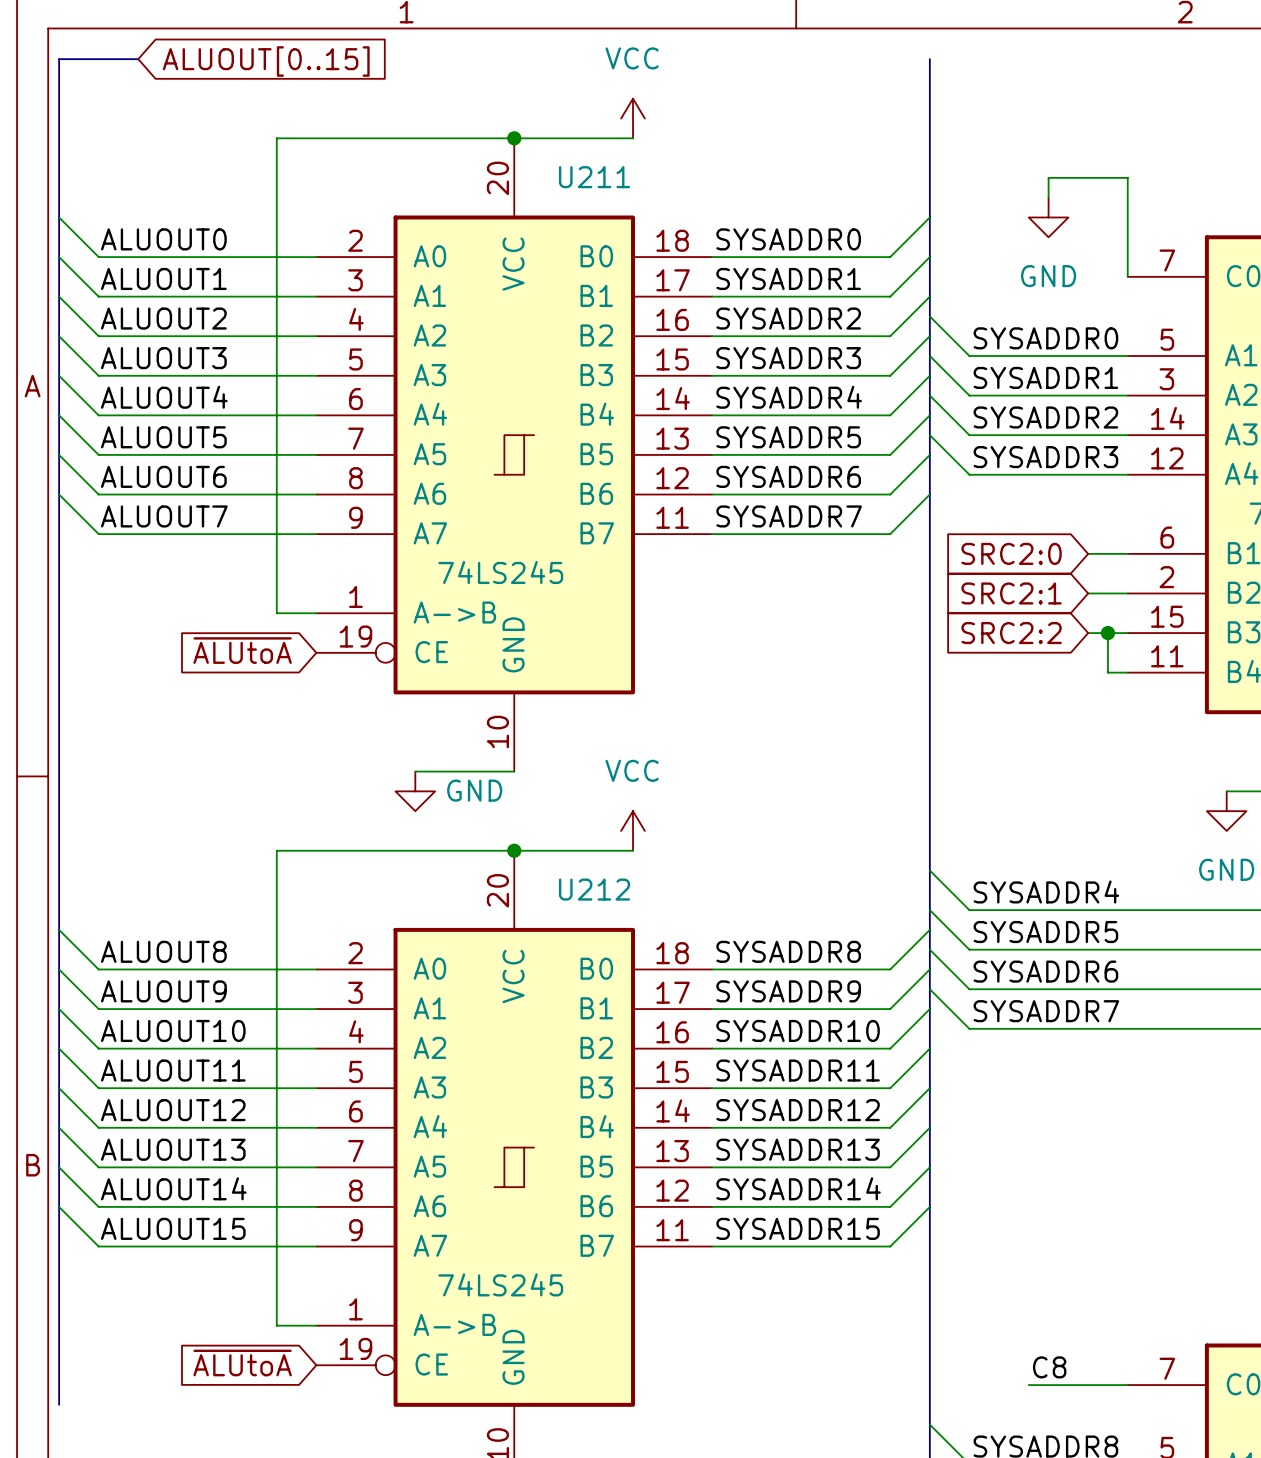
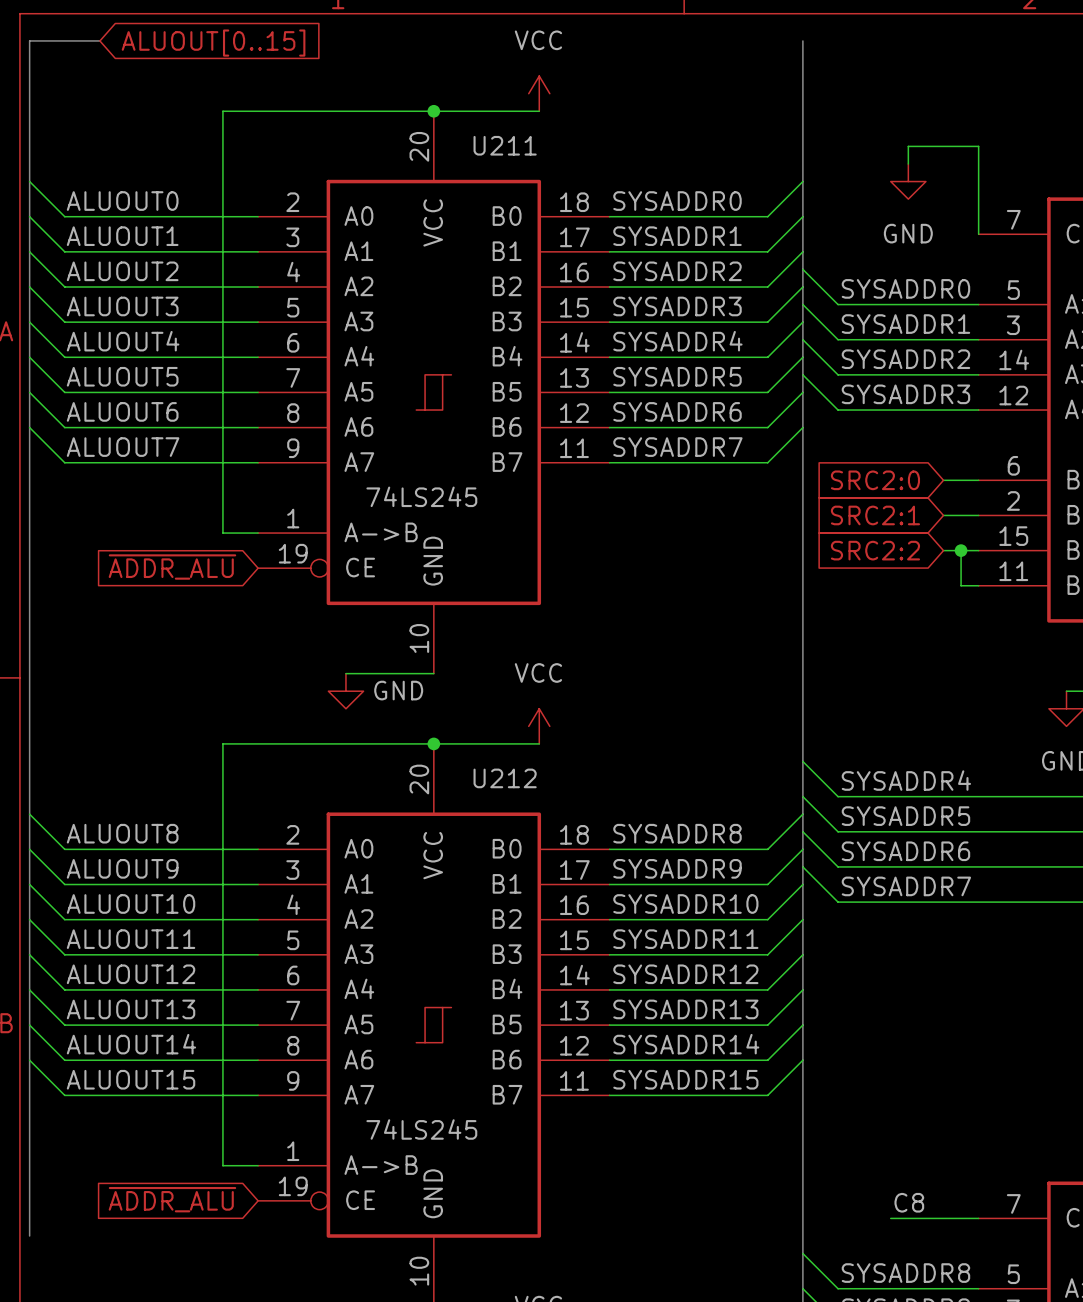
global label: ~{ALUtoA} (242, 650) -> ~{ADDR_ALU} (172, 567)
global label: ~{ALUtoA} (242, 1362) -> ~{ADDR_ALU} (172, 1199)

